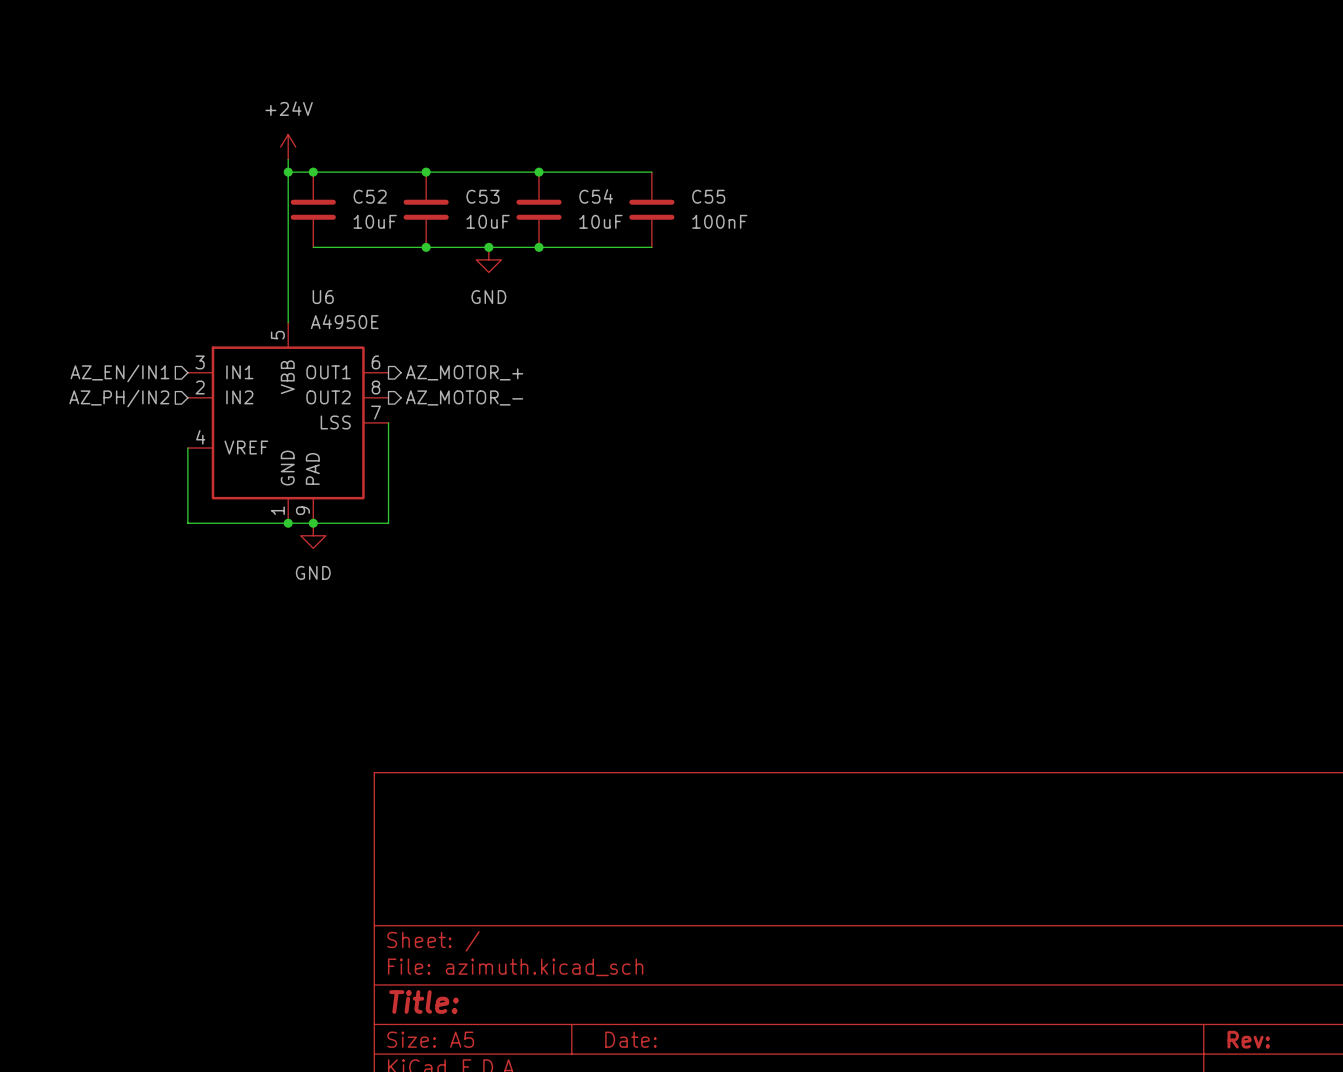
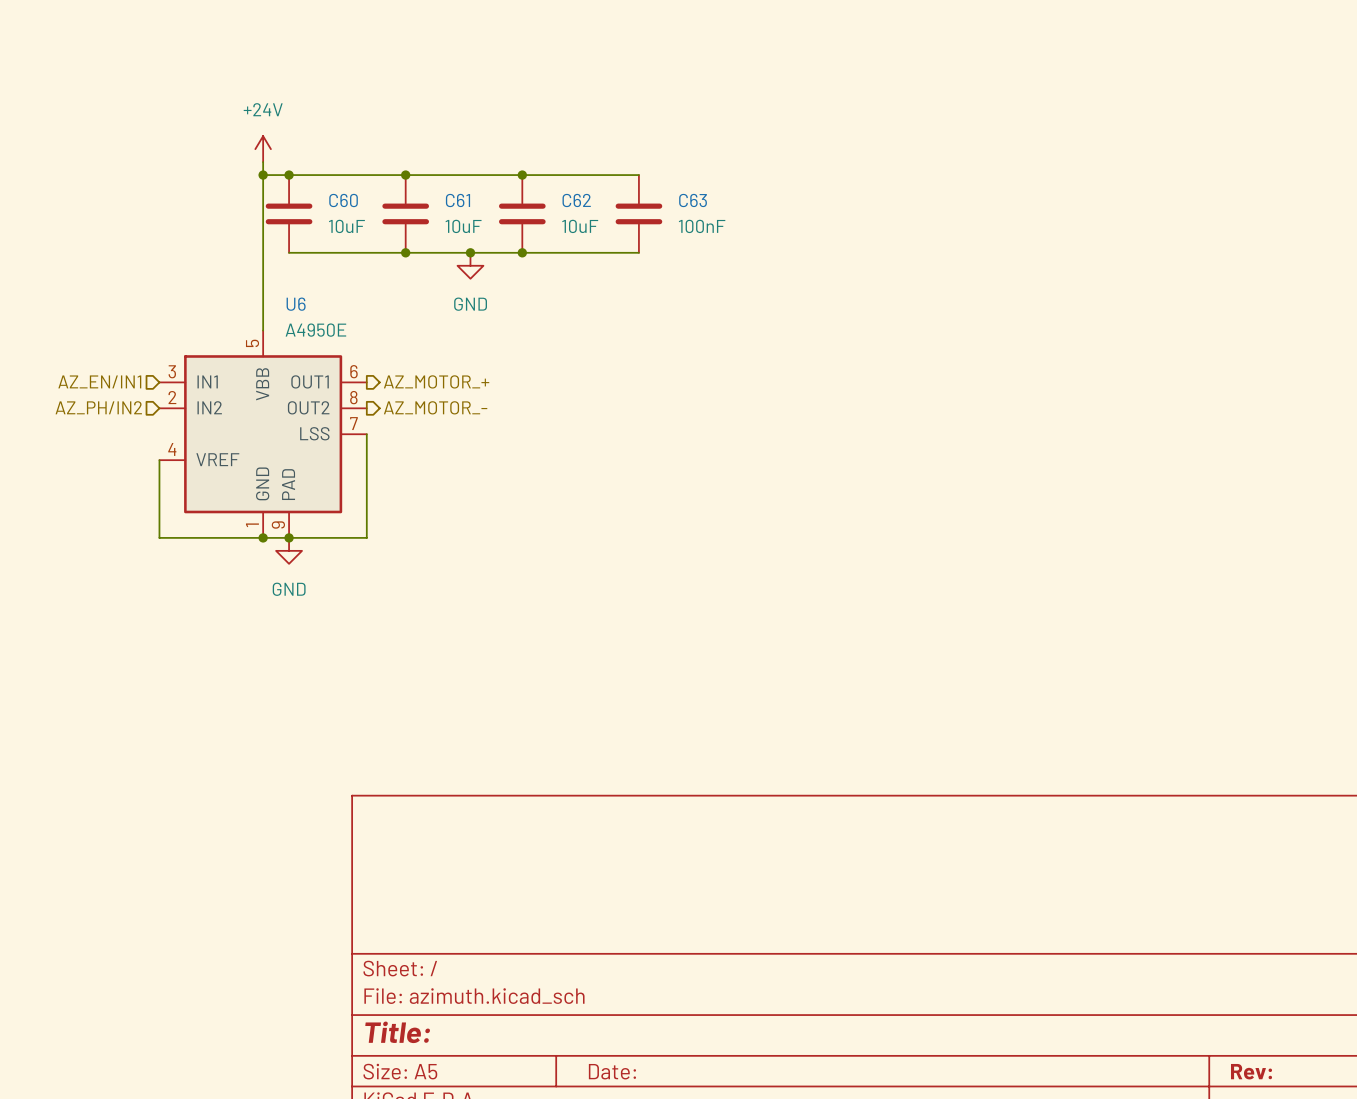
C52 name: C52 (370, 196) -> C60 (343, 200)
C53 name: C53 (482, 196) -> C61 (457, 200)
C54 name: C54 (596, 196) -> C62 (576, 200)
C55 name: C55 (708, 196) -> C63 (693, 200)

